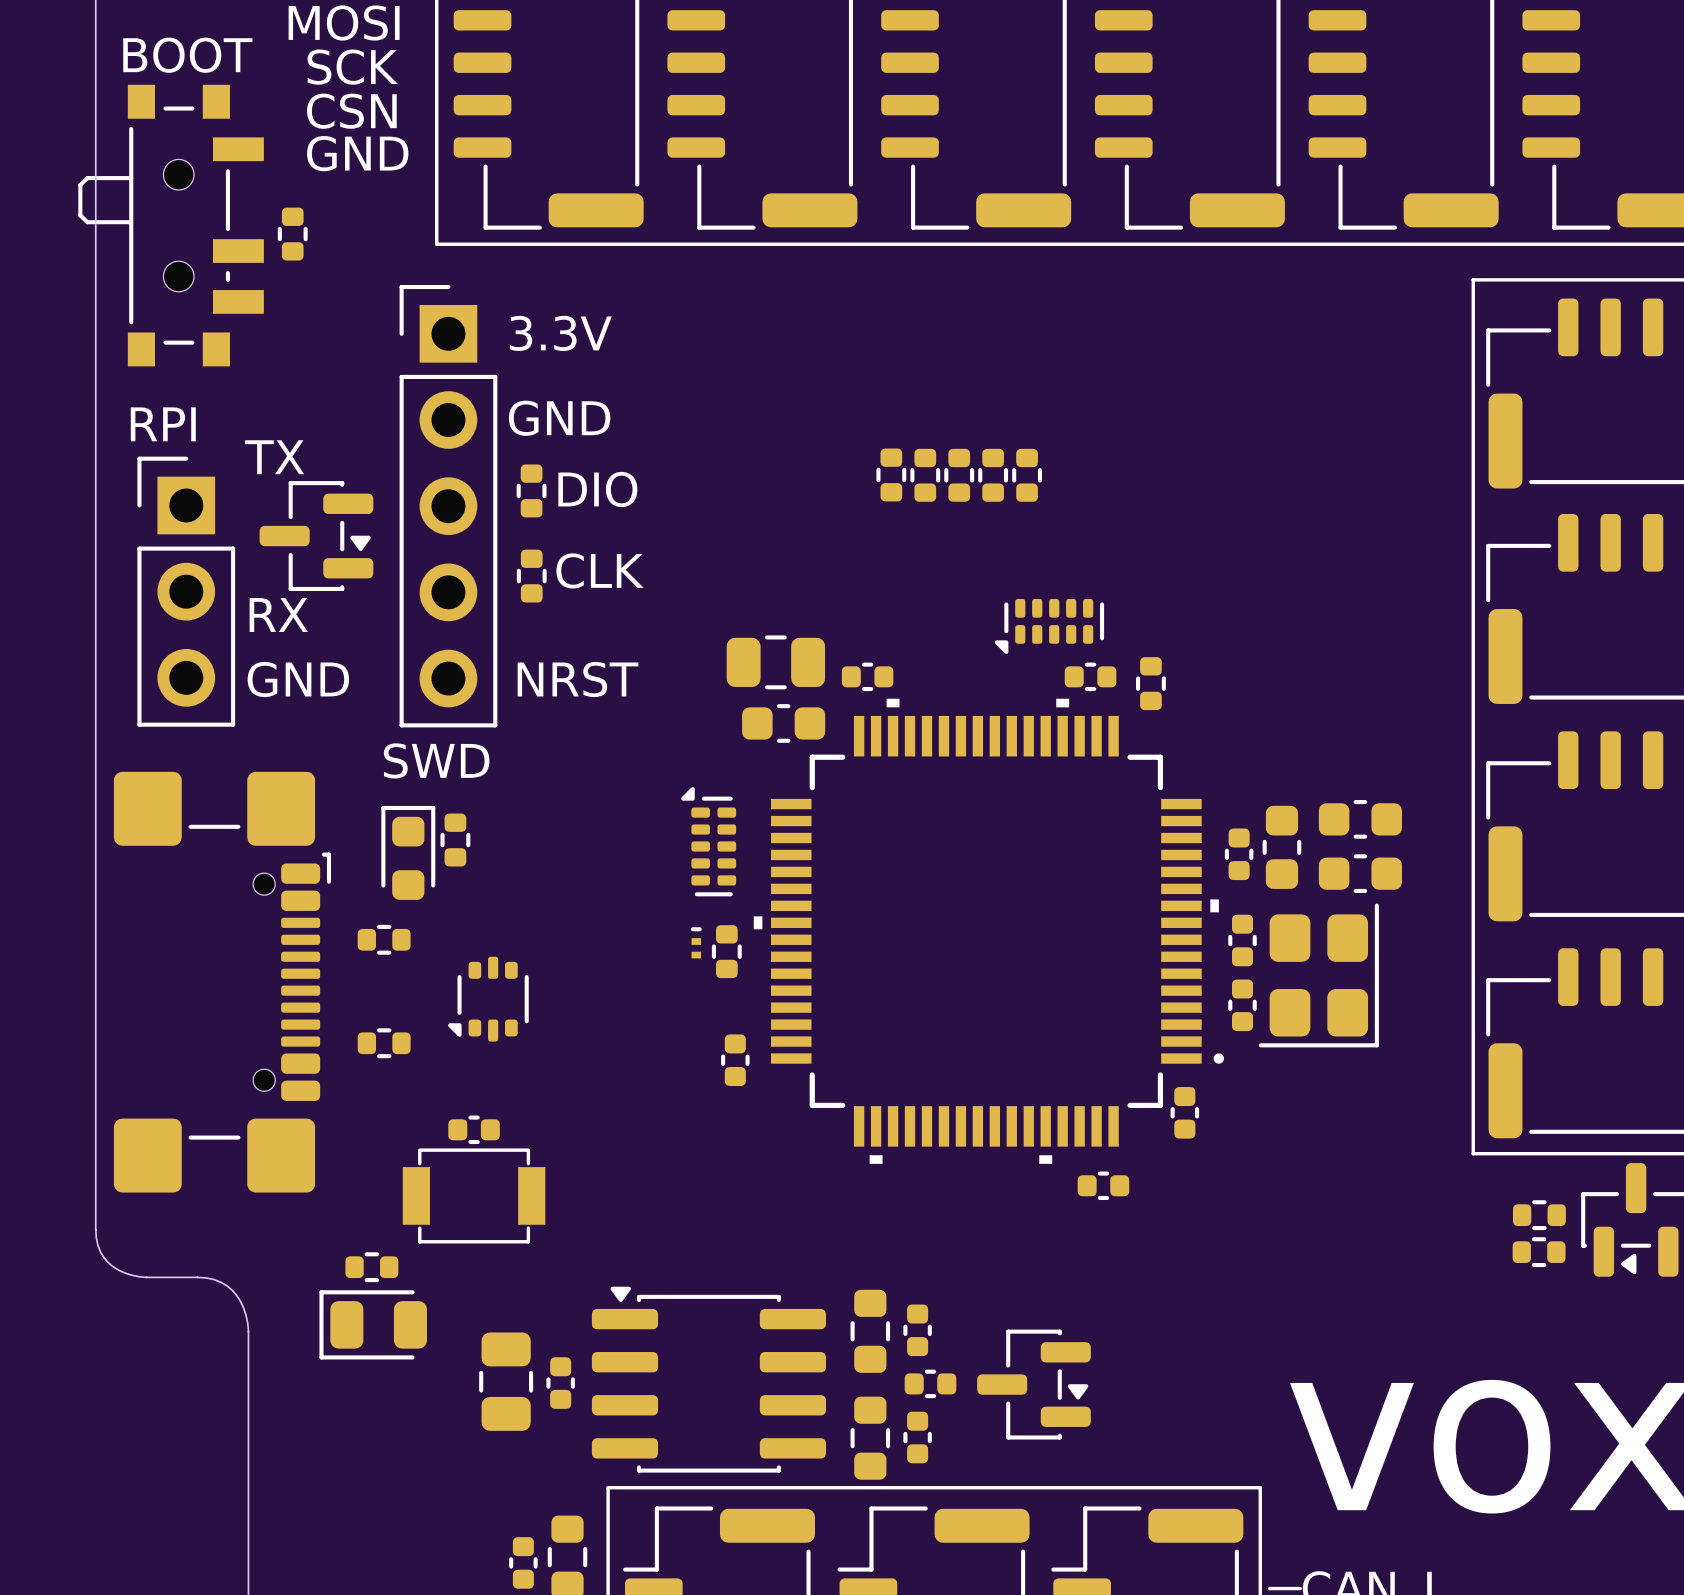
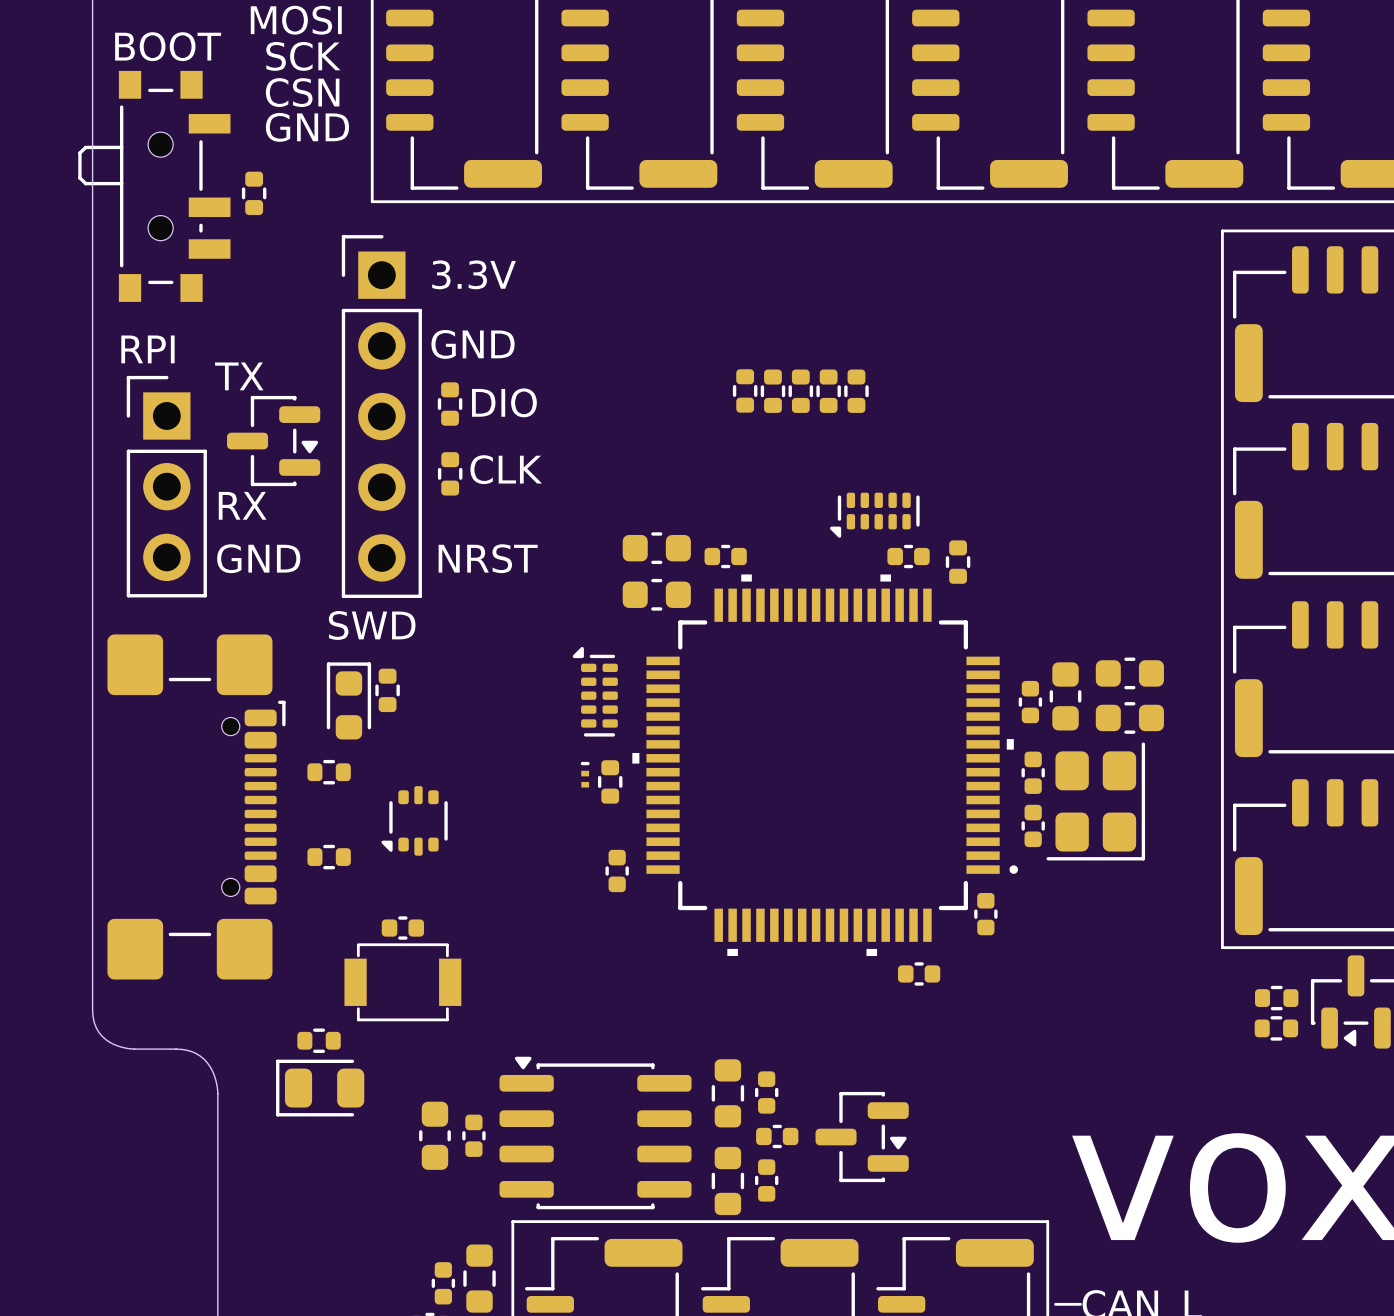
part footprint: [726, 635, 826, 690] -> [622, 532, 691, 565]
part footprint: [479, 1332, 534, 1431] -> [419, 1101, 451, 1170]

